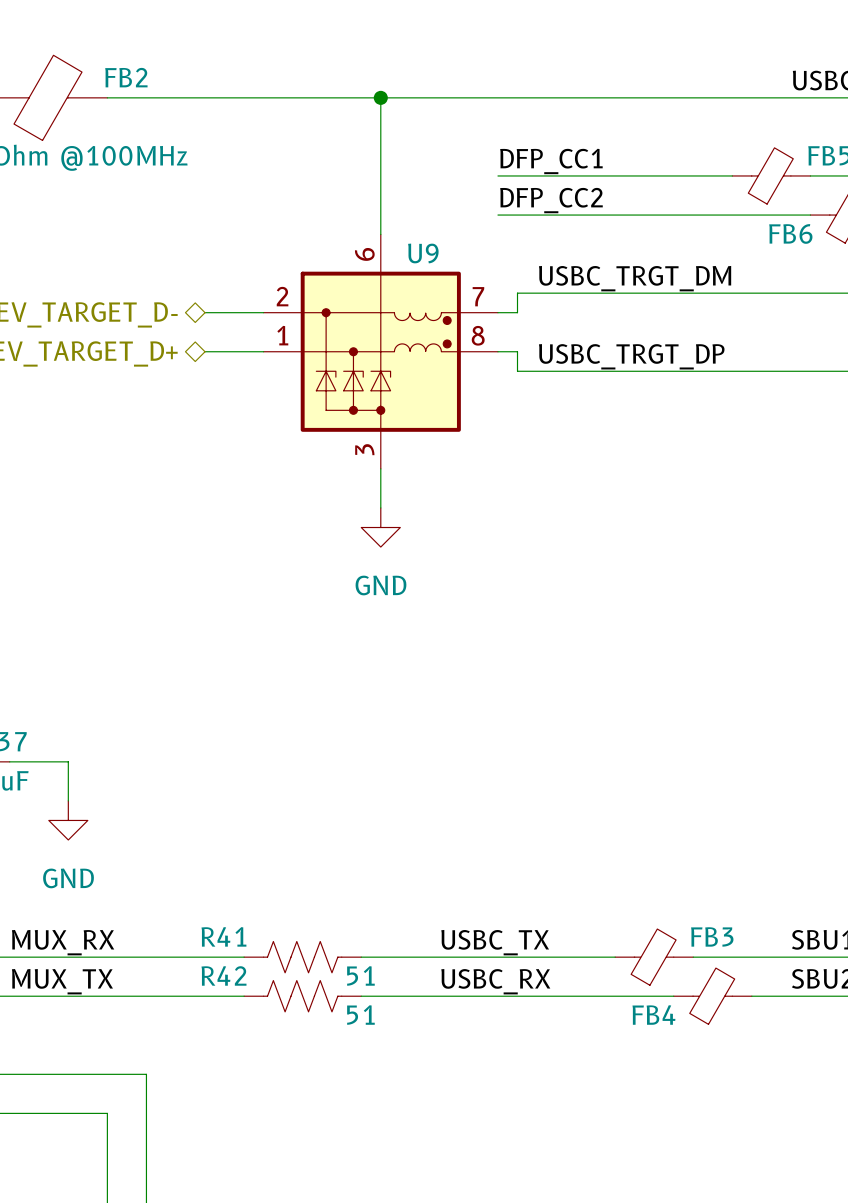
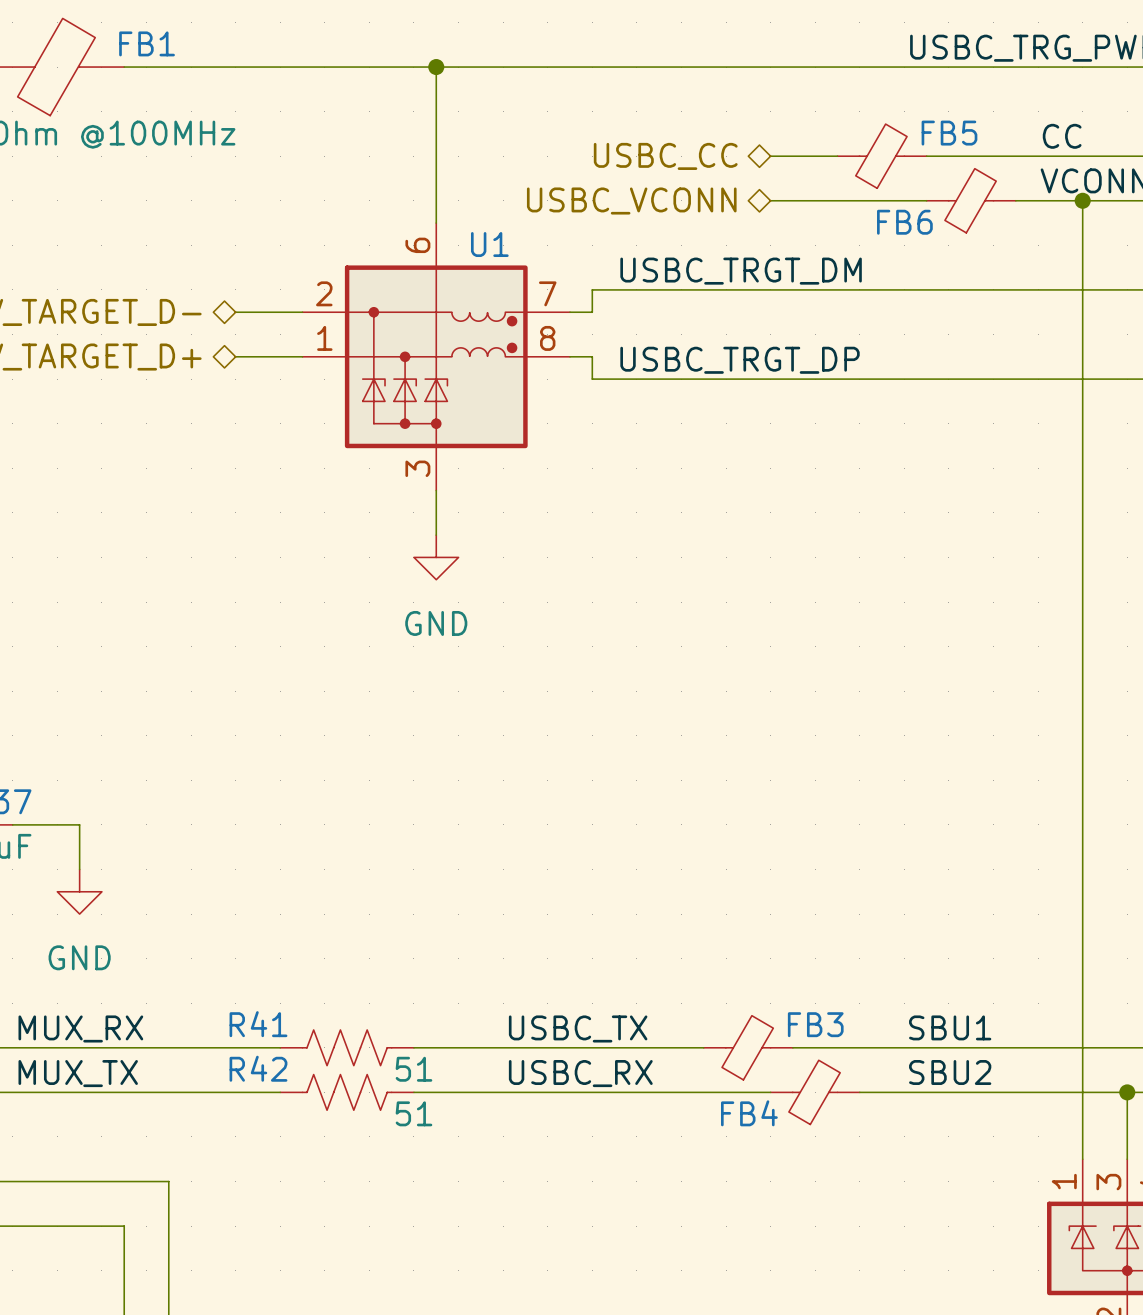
FB2 name: FB2 (126, 77) -> FB1 (147, 43)
label: DFP_CC1 (551, 161) -> none
wire: (497, 175) (673, 175) -> none
hierarchical label: none -> USBC_CC (665, 156)
label: DFP_CC2 (551, 200) -> none
wire: (497, 215) (673, 215) -> none
hierarchical label: none -> USBC_VCONN (631, 201)
U9 name: U9 (423, 253) -> U1 (489, 244)

